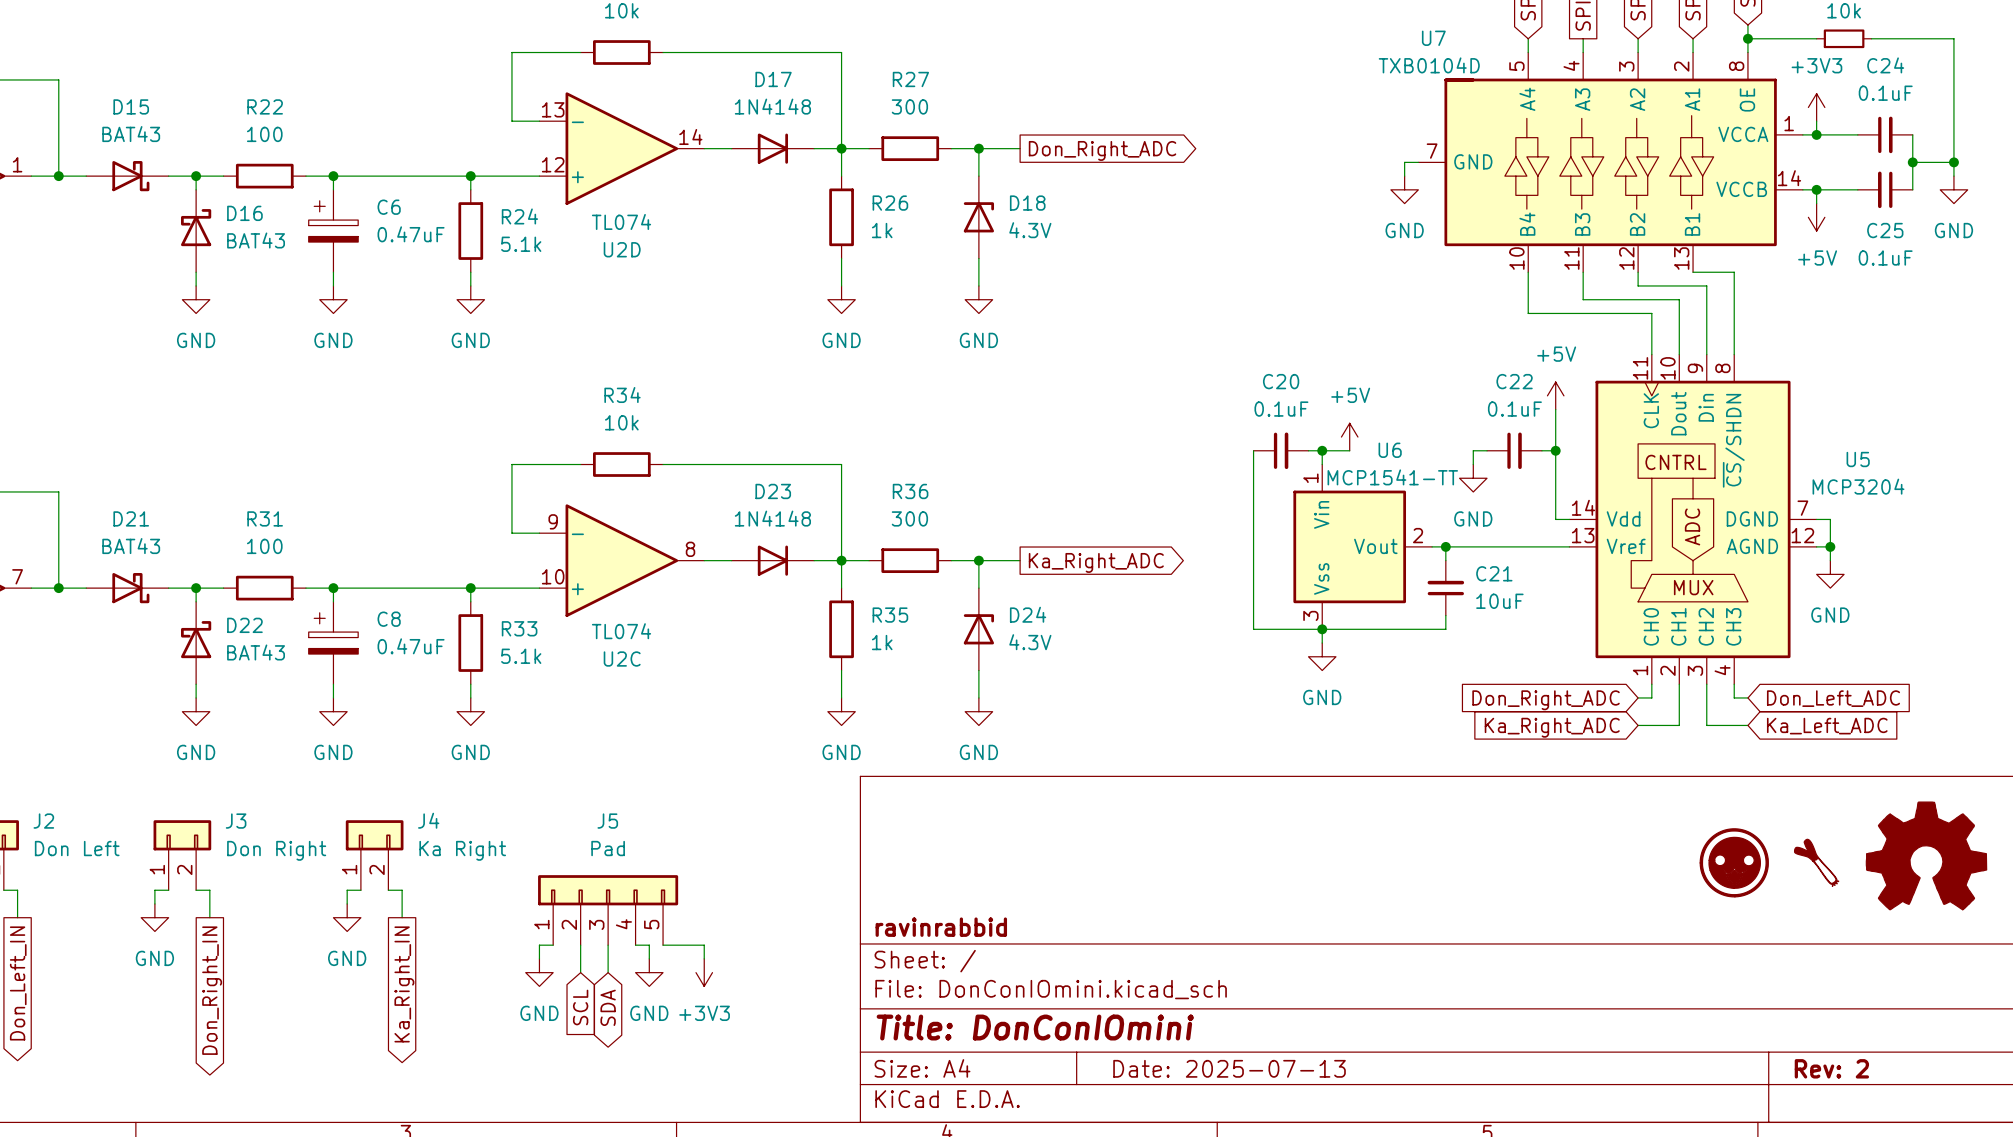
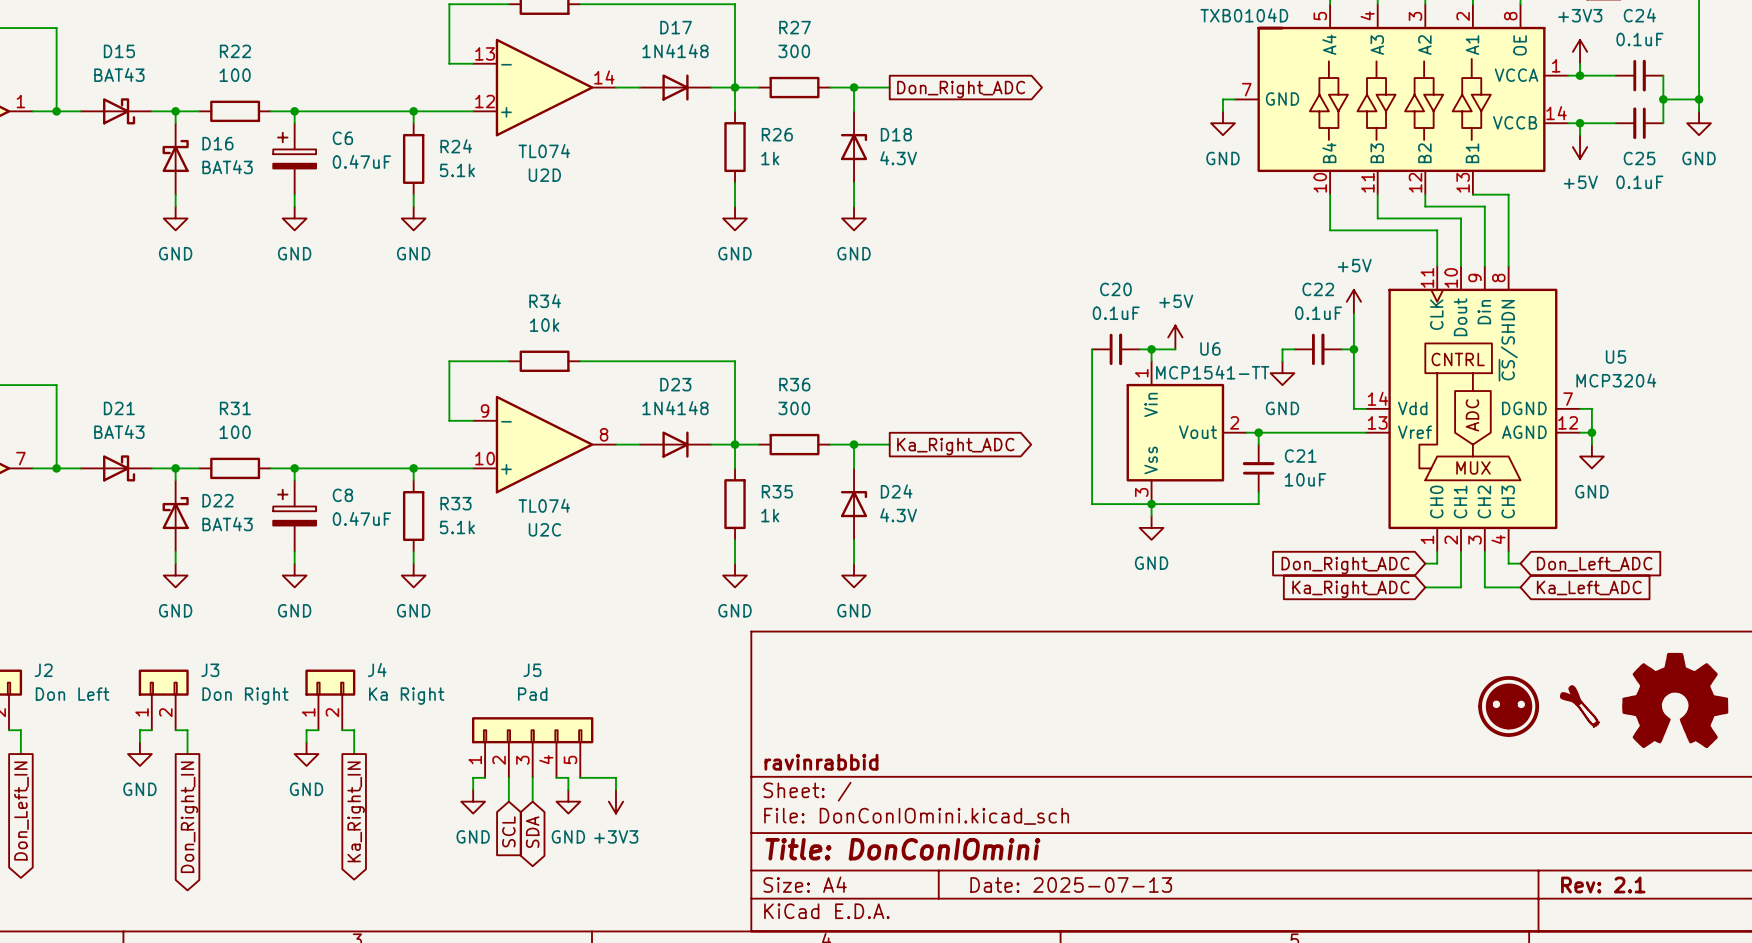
title block: Rev: 2 (1831, 1068) -> Rev: 2.1 (1603, 885)

